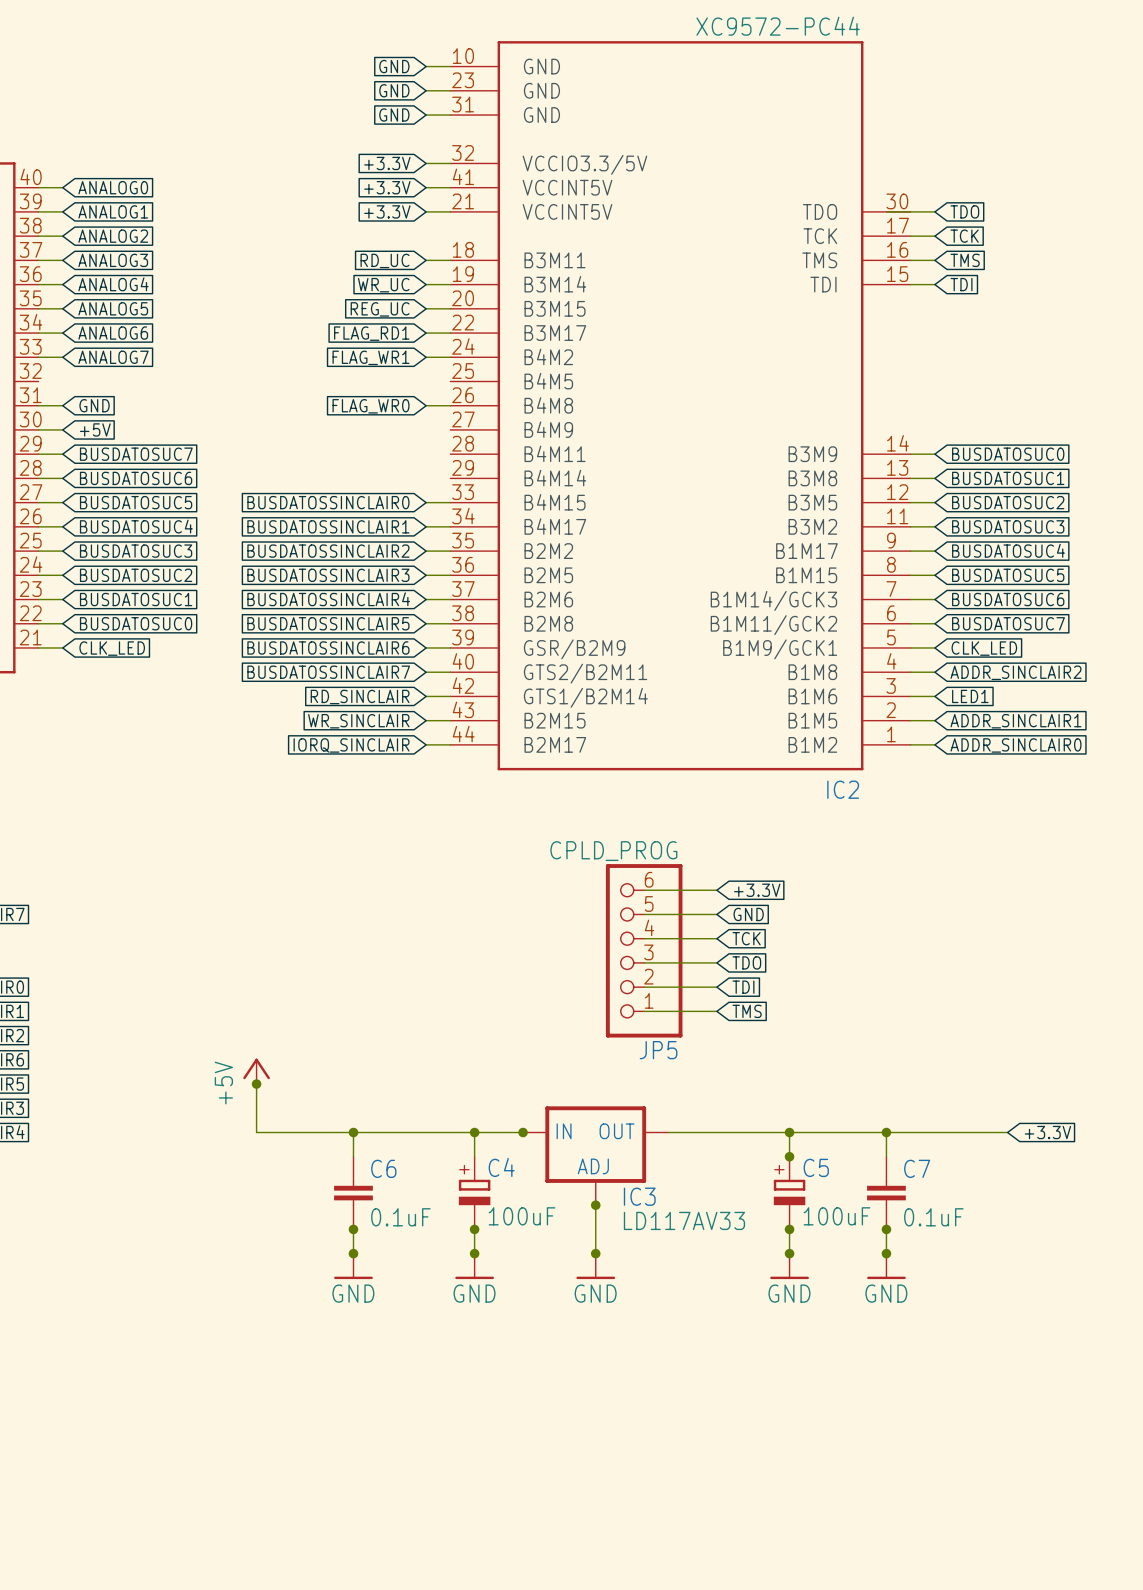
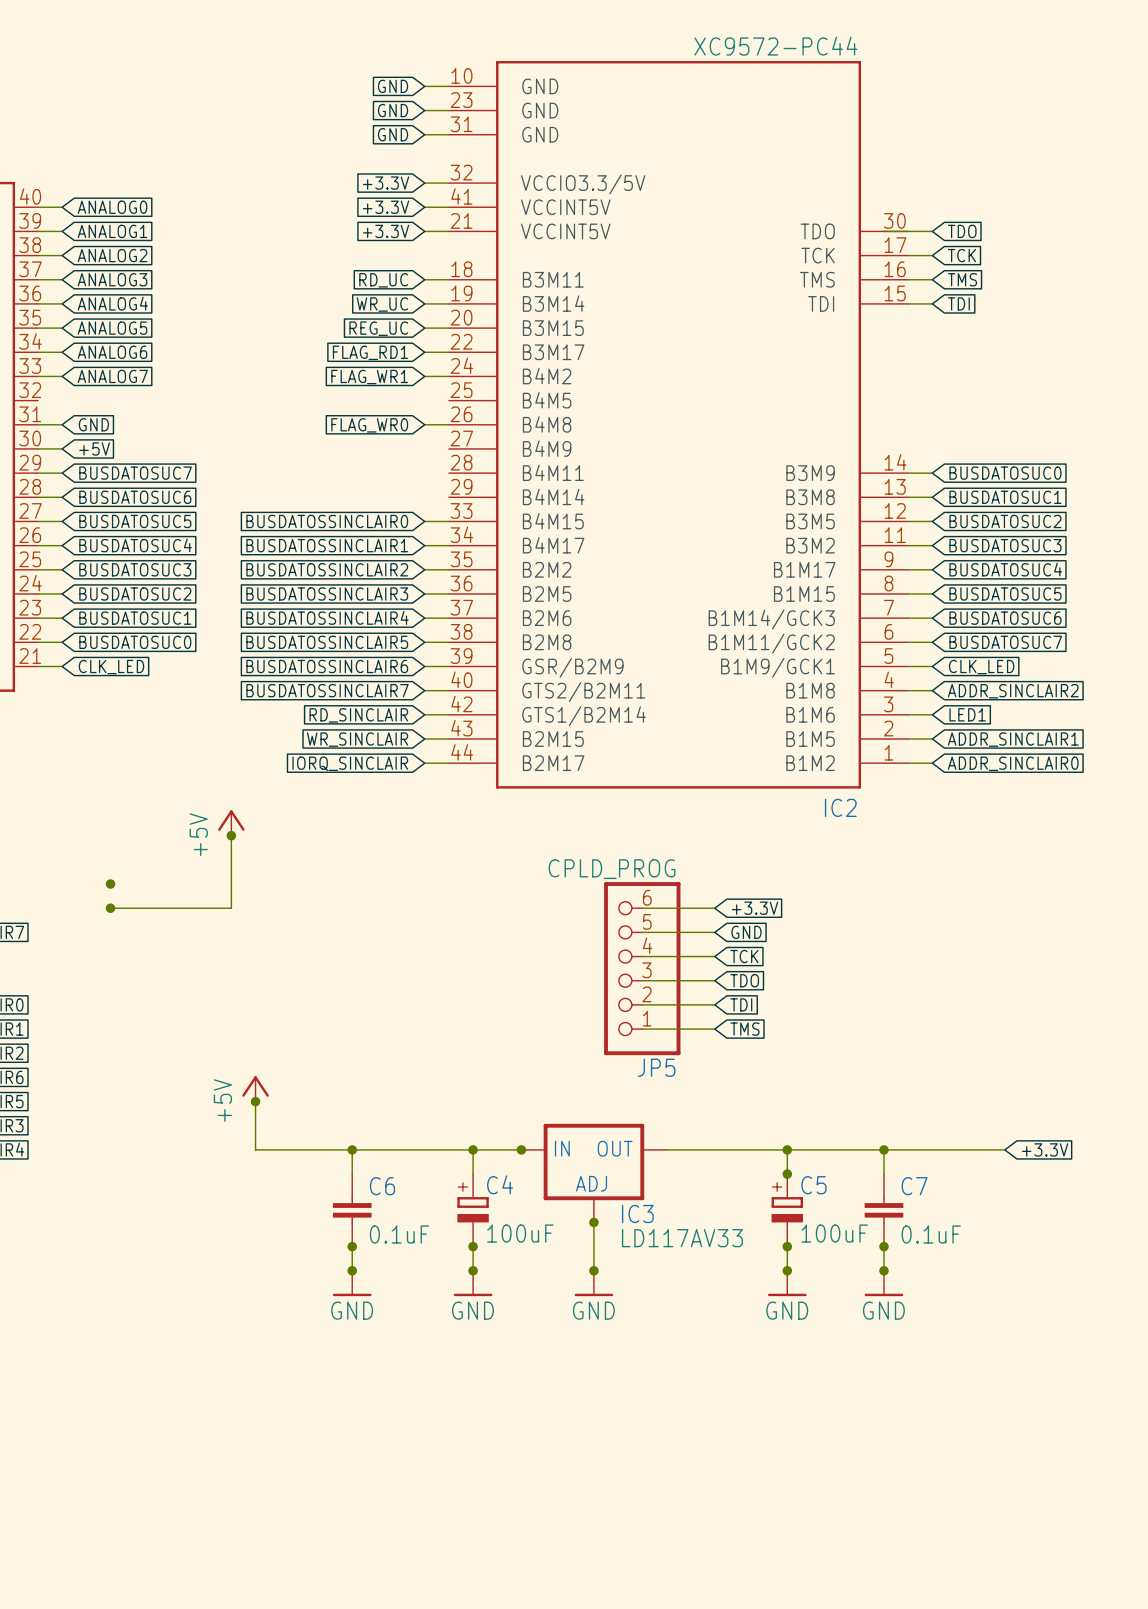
power symbol: none -> +5V (231, 823)
wire: none -> (231, 835) (231, 908) (110, 908)
junction: none -> (231, 835)
junction: none -> (110, 884)
junction: none -> (110, 908)

